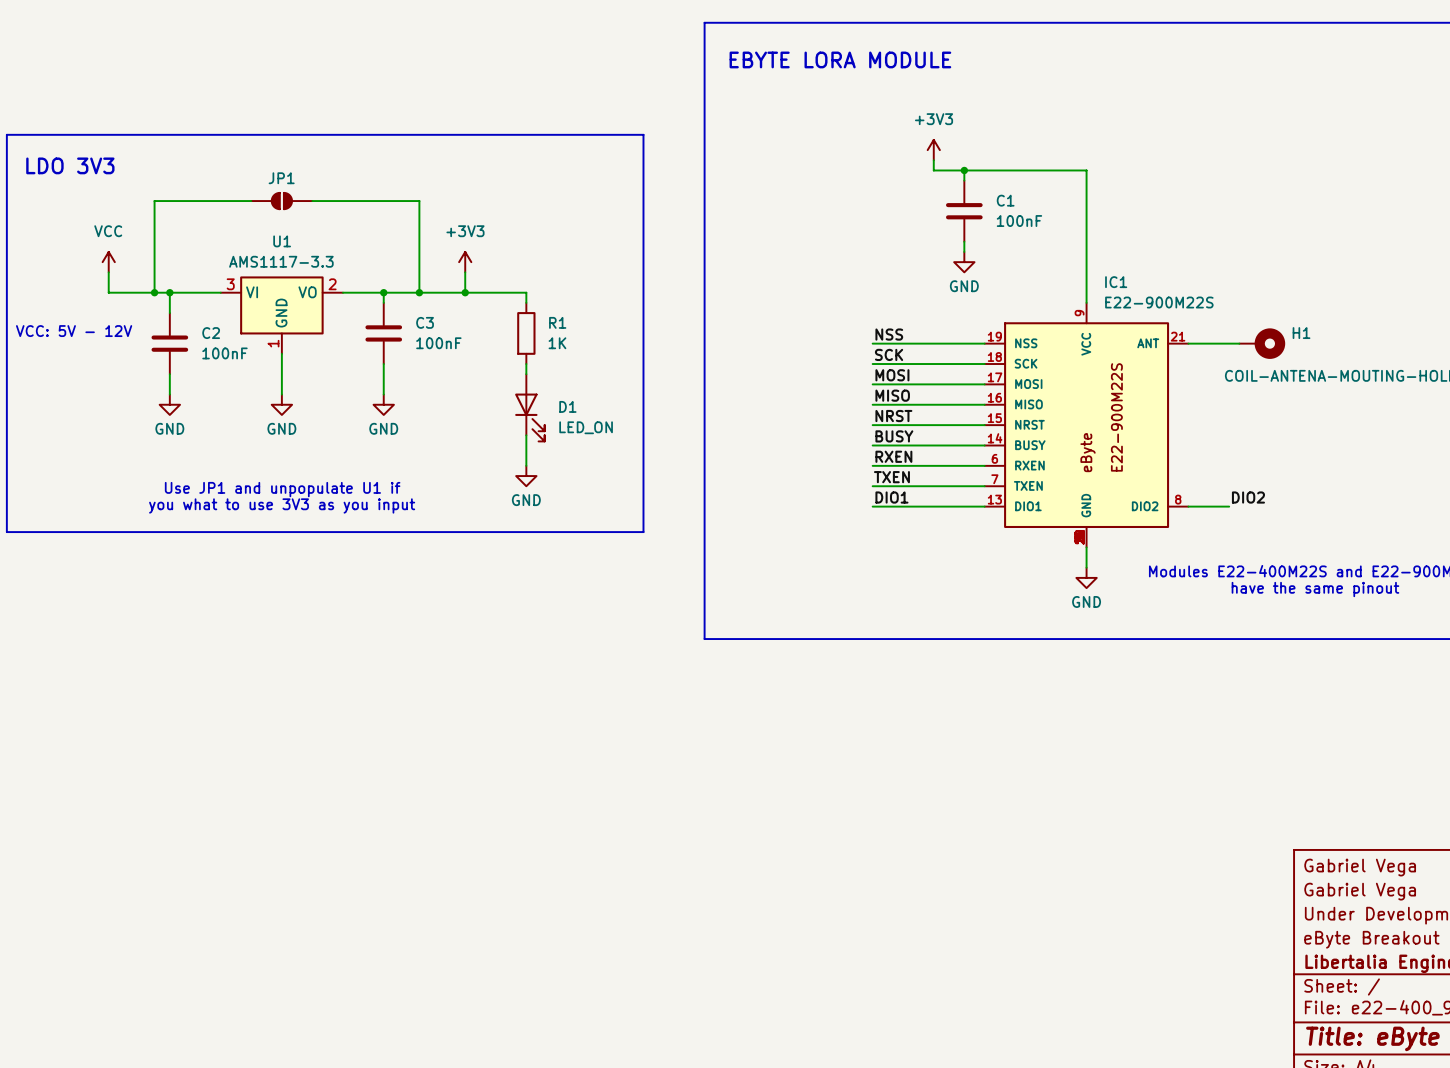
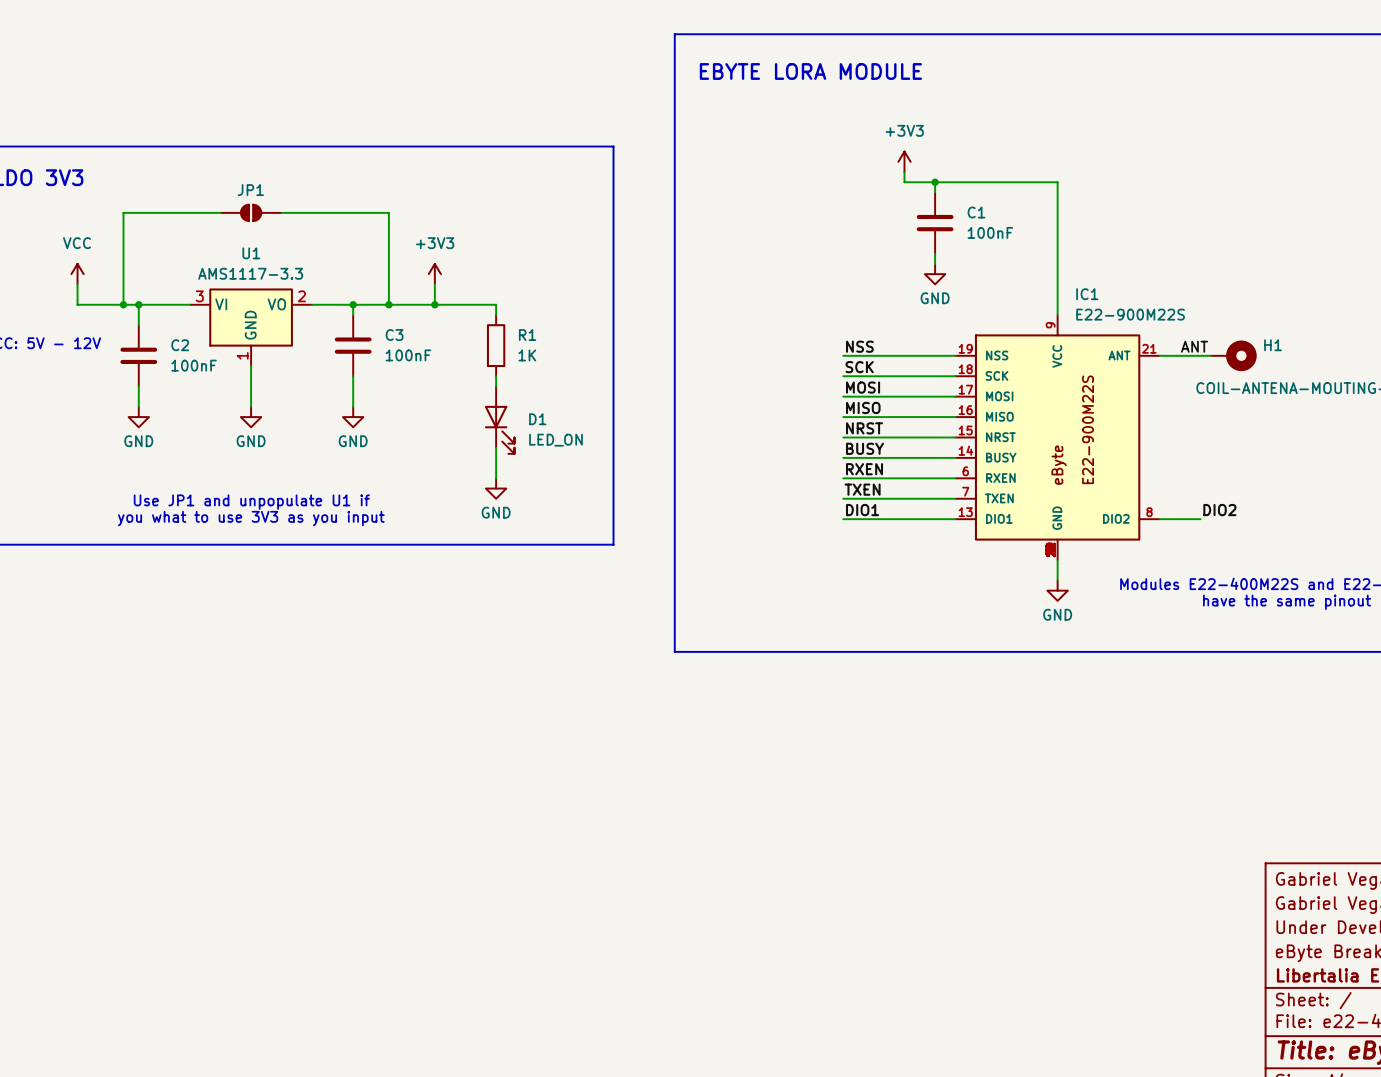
label: none -> ANT (1194, 346)

